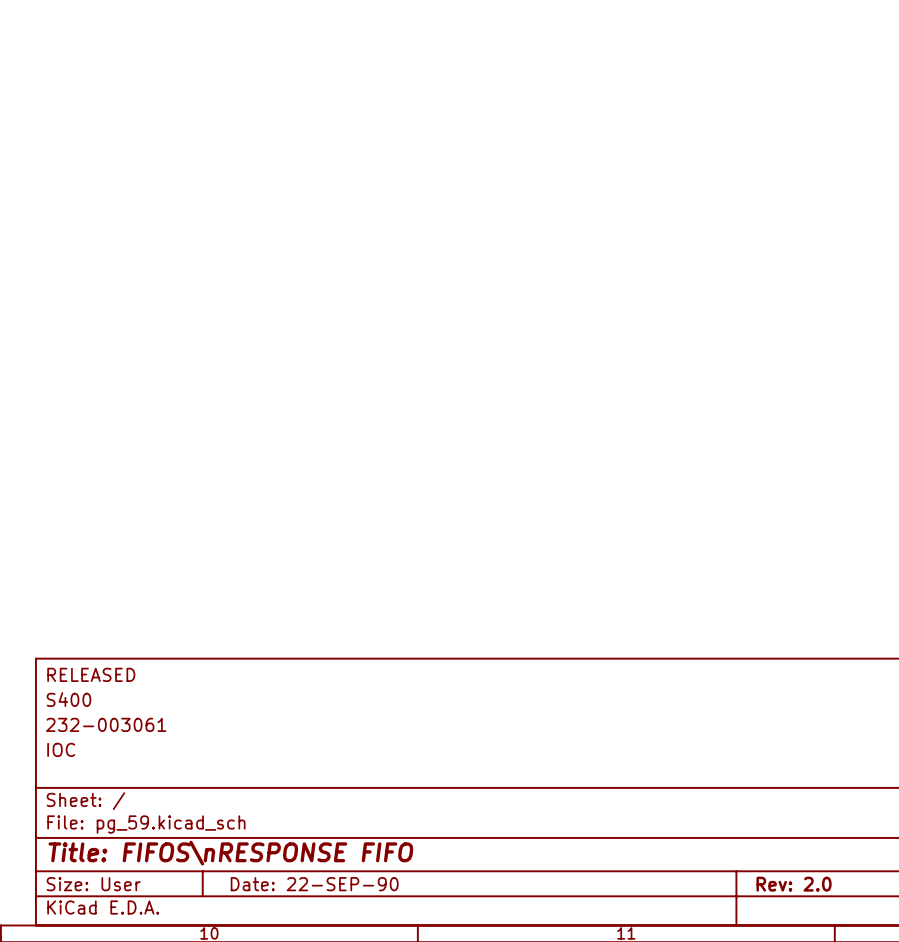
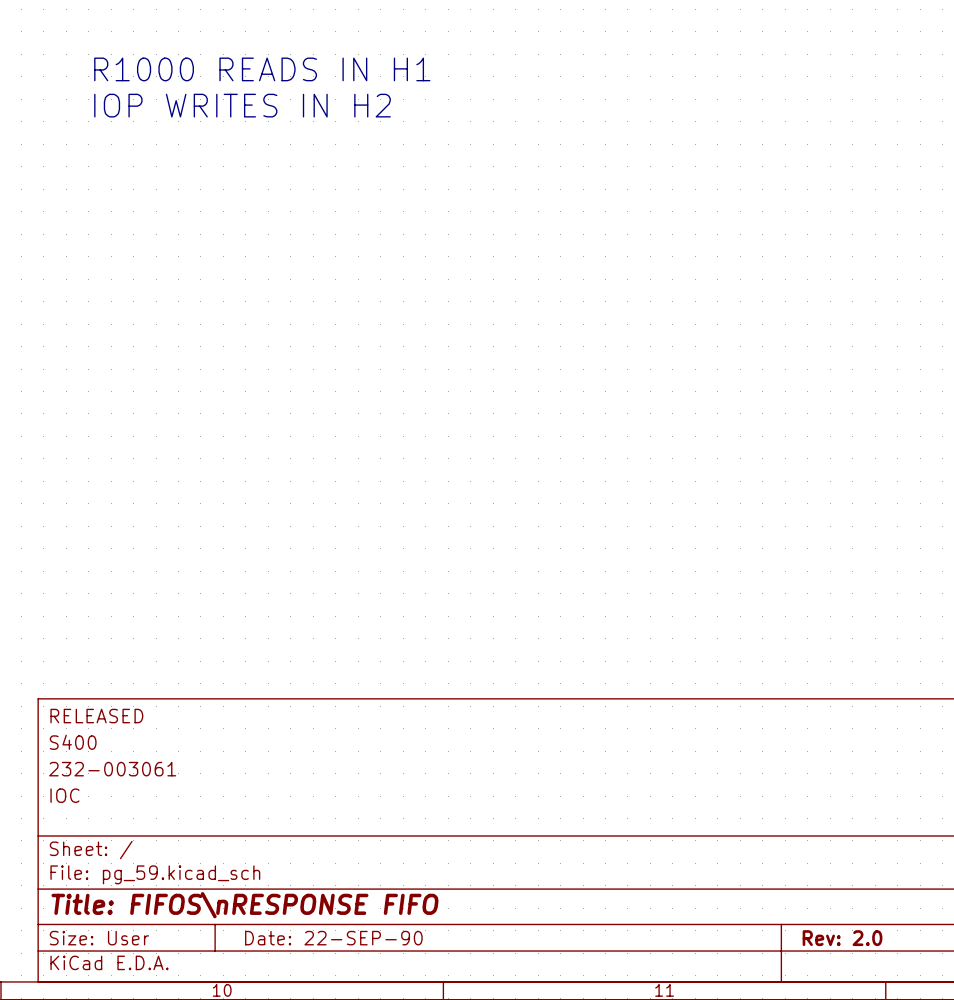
text: none -> R1000 READS IN H1 (262, 69)
text: none -> IOP WRITES IN H2 (242, 105)

